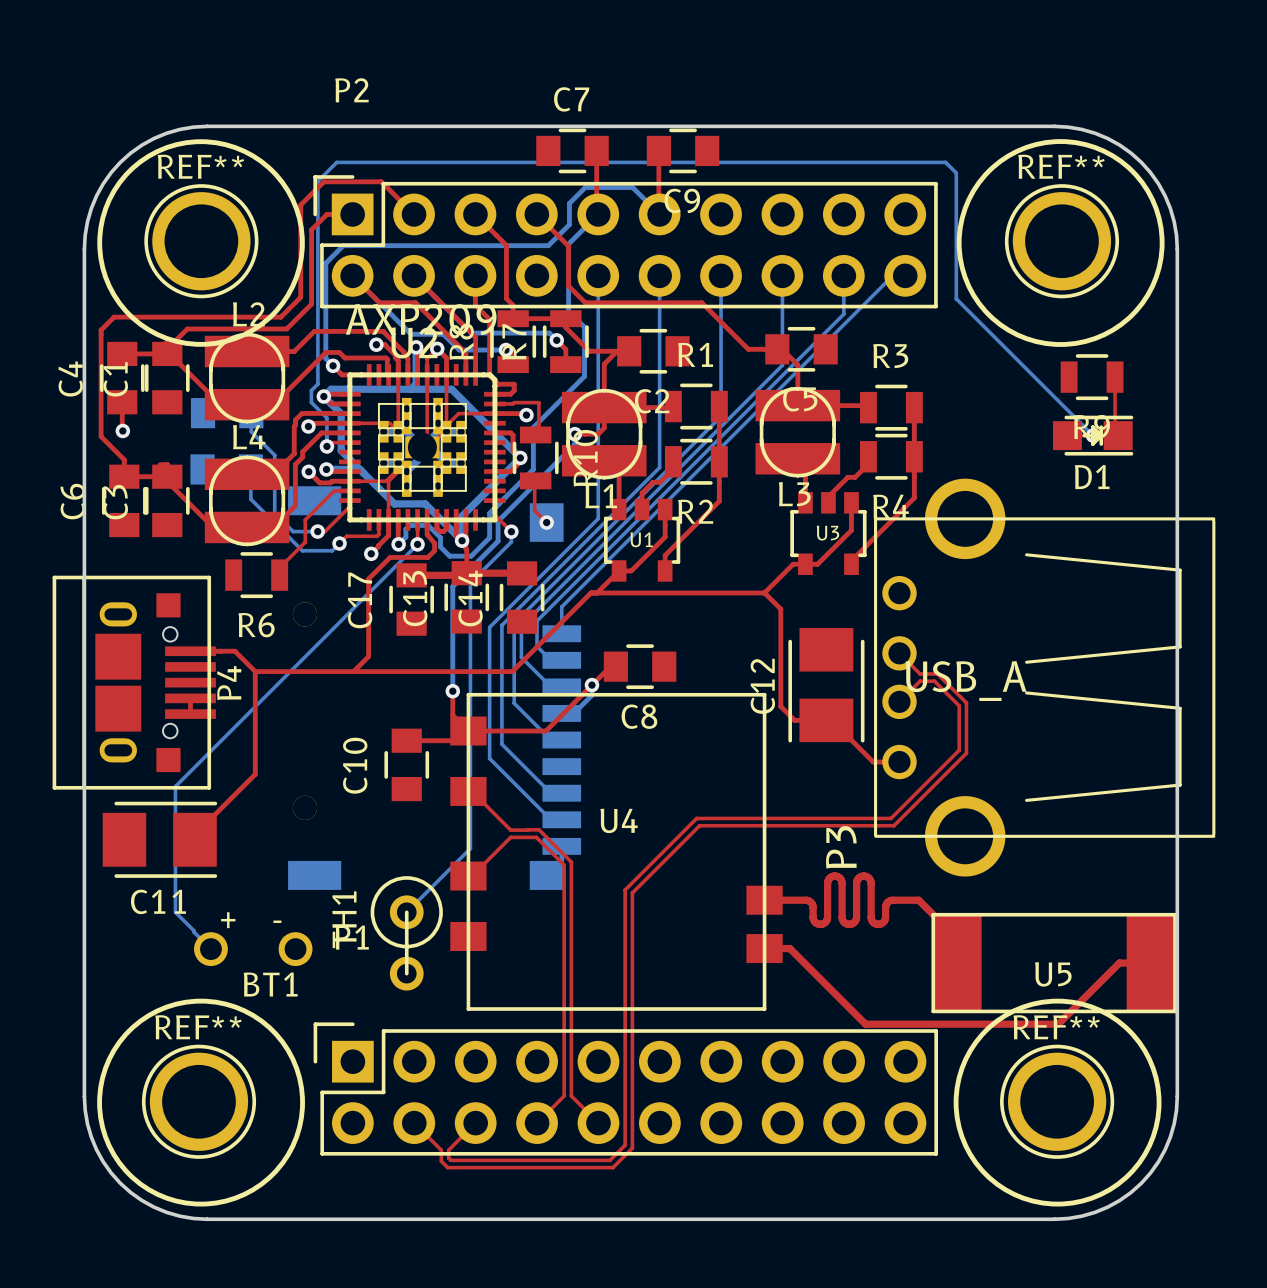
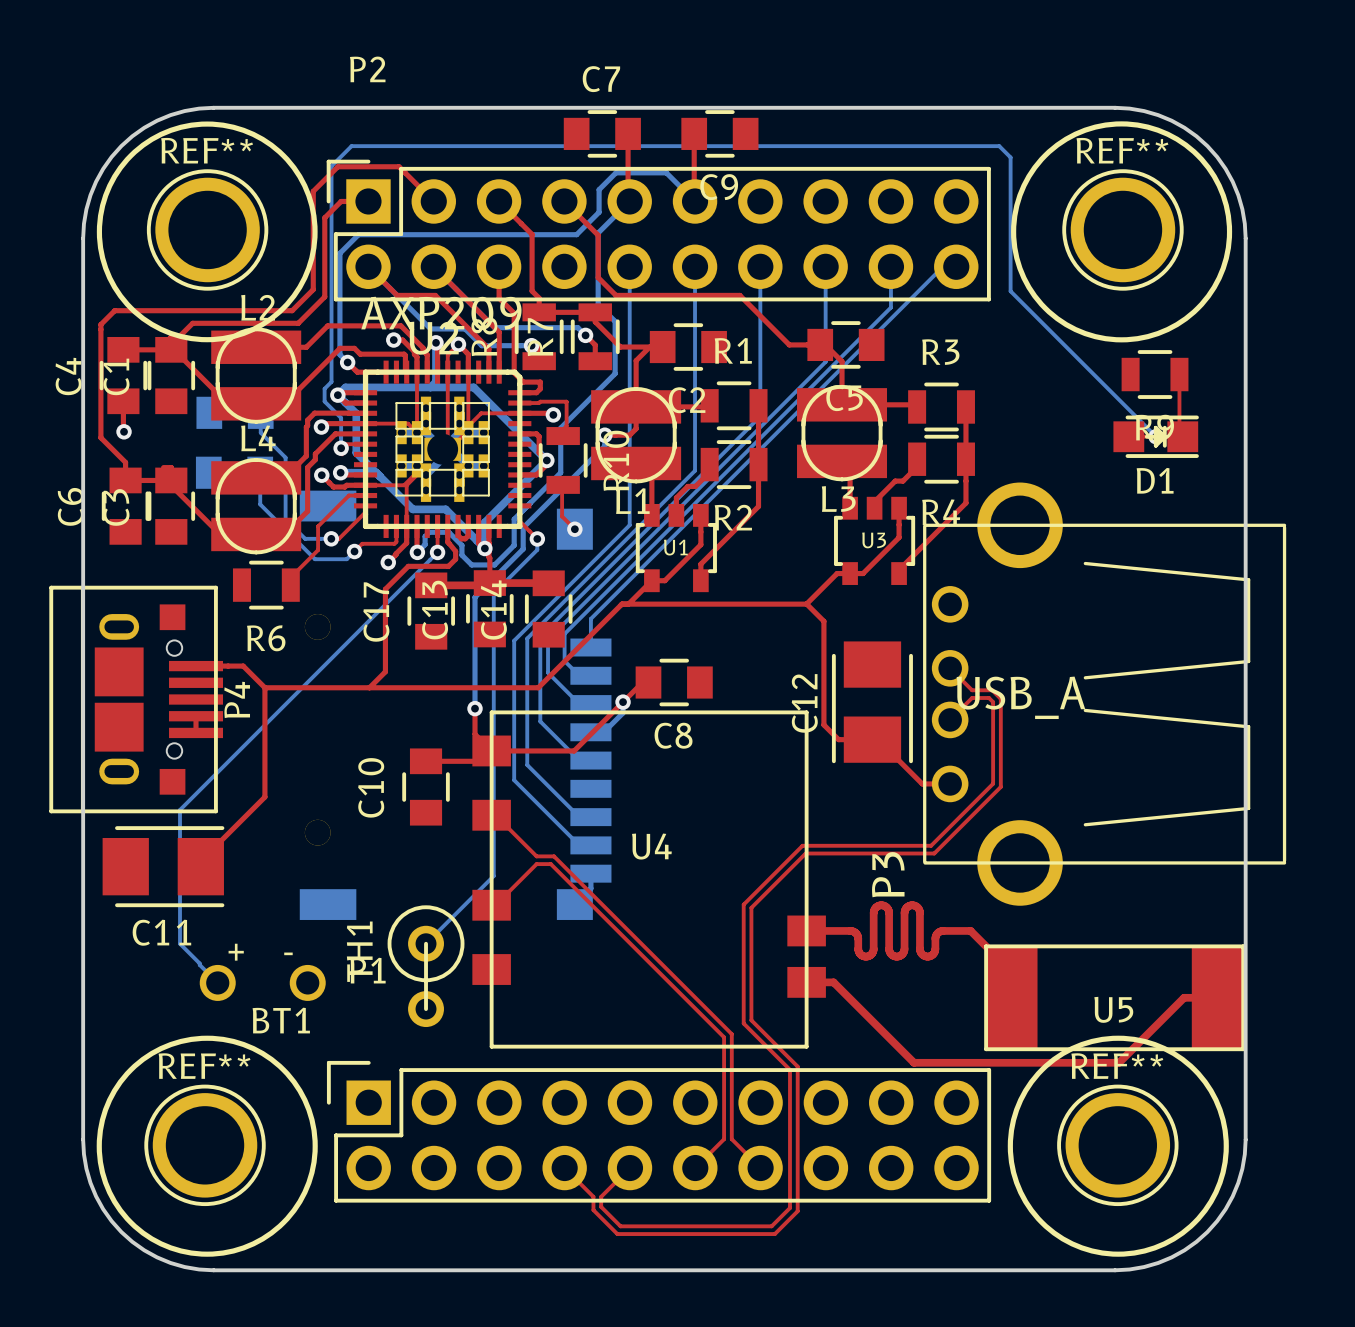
top track: (937, 673) (966, 702) (966, 753) (894, 825) (699, 825) (632, 892) (632, 1148) (613, 1167) (447, 1167) (441, 1161) (441, 1150) (414, 1123) -> (990, 690) (1000, 698) (1000, 786) (934, 853) (805, 853) (751, 907) (751, 1020) (797, 1066) (797, 1211) (774, 1234) (617, 1234) (593, 1210) (593, 1196) (564, 1168)
top track: (934, 681) (959, 705) (959, 750) (891, 818) (696, 818) (625, 889) (625, 1145) (610, 1160) (450, 1160) (448, 1158) (448, 1150) (475, 1123) -> (987, 697) (993, 702) (993, 783) (931, 845) (802, 845) (743, 904) (743, 1023) (789, 1069) (789, 1208) (771, 1226) (620, 1226) (601, 1206) (601, 1196) (629, 1168)
top track: (527, 829) (539, 829) (571, 862) (571, 1096) (598, 1123) -> (554, 856) (731, 1034) (731, 1139) (760, 1168)
top track: (524, 837) (536, 837) (564, 865) (564, 1096) (537, 1123) -> (550, 864) (724, 1037) (724, 1139) (695, 1168)

